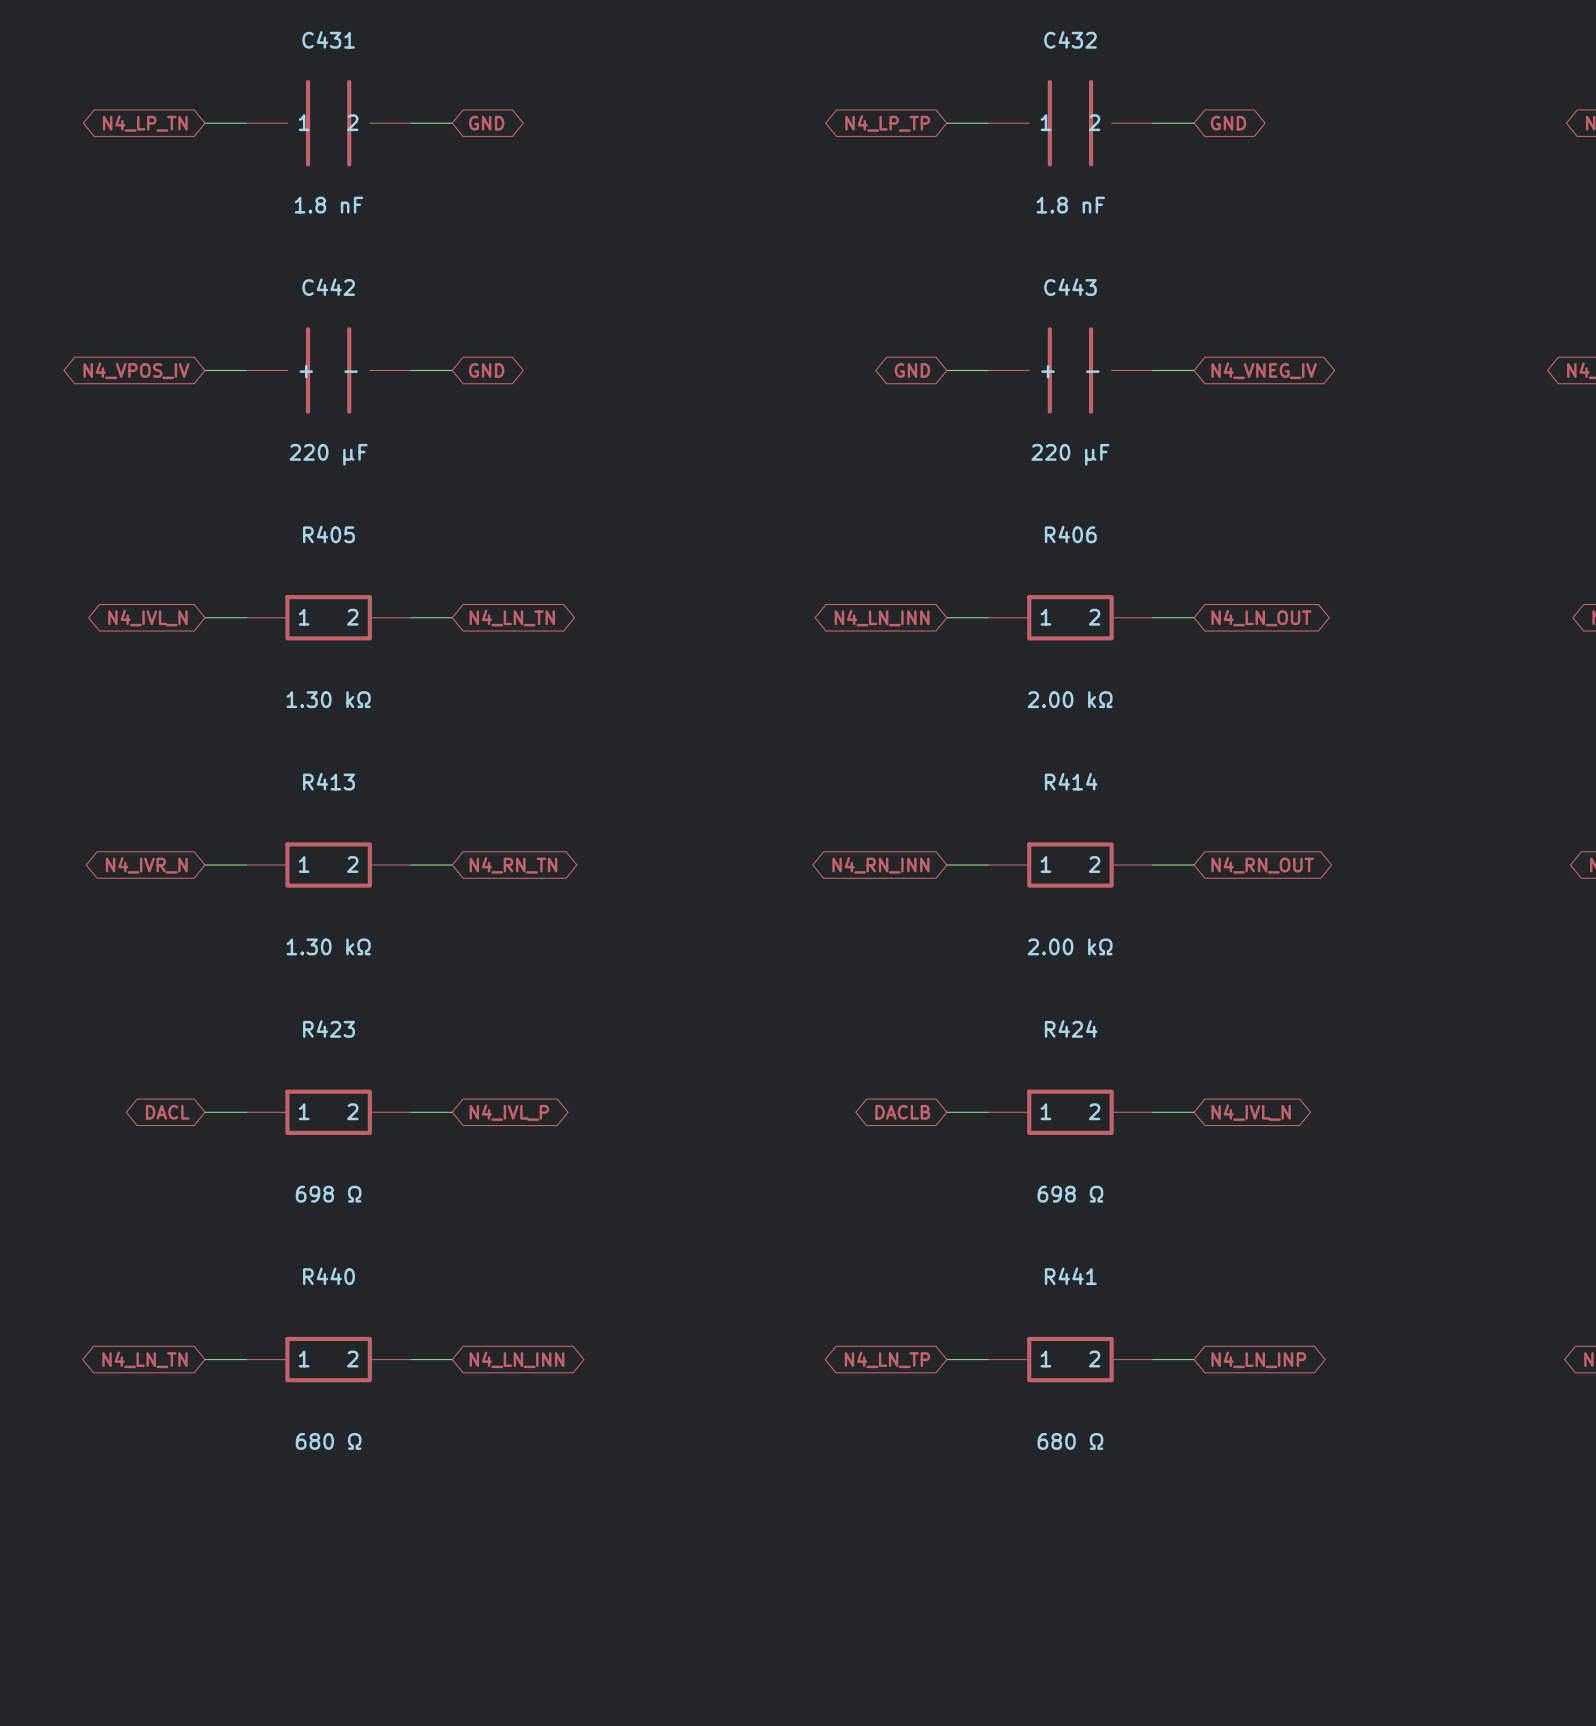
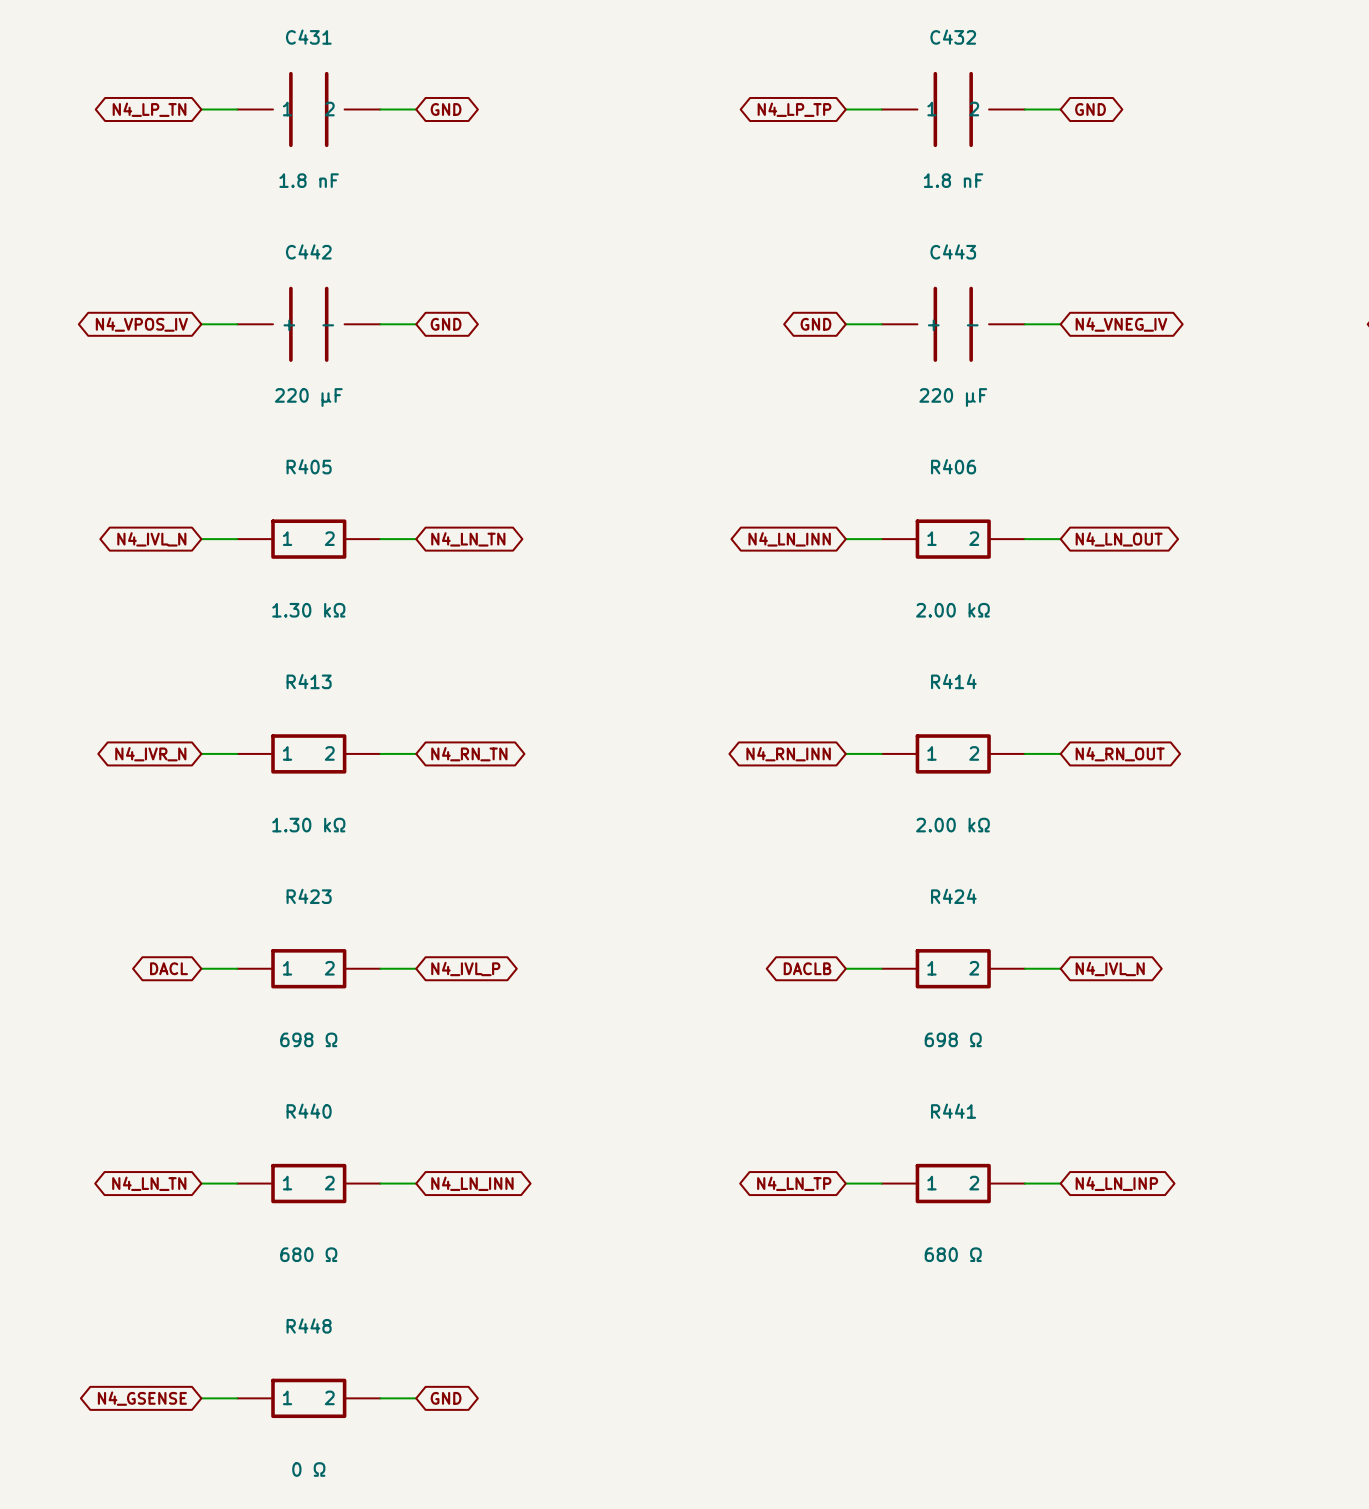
wire: none -> (201, 1398) (237, 1398)
R448: none -> 0 Ω (308, 1398)
wire: none -> (380, 1398) (416, 1398)
global label: none -> GND (446, 1398)
global label: none -> N4_GSENSE (142, 1398)

